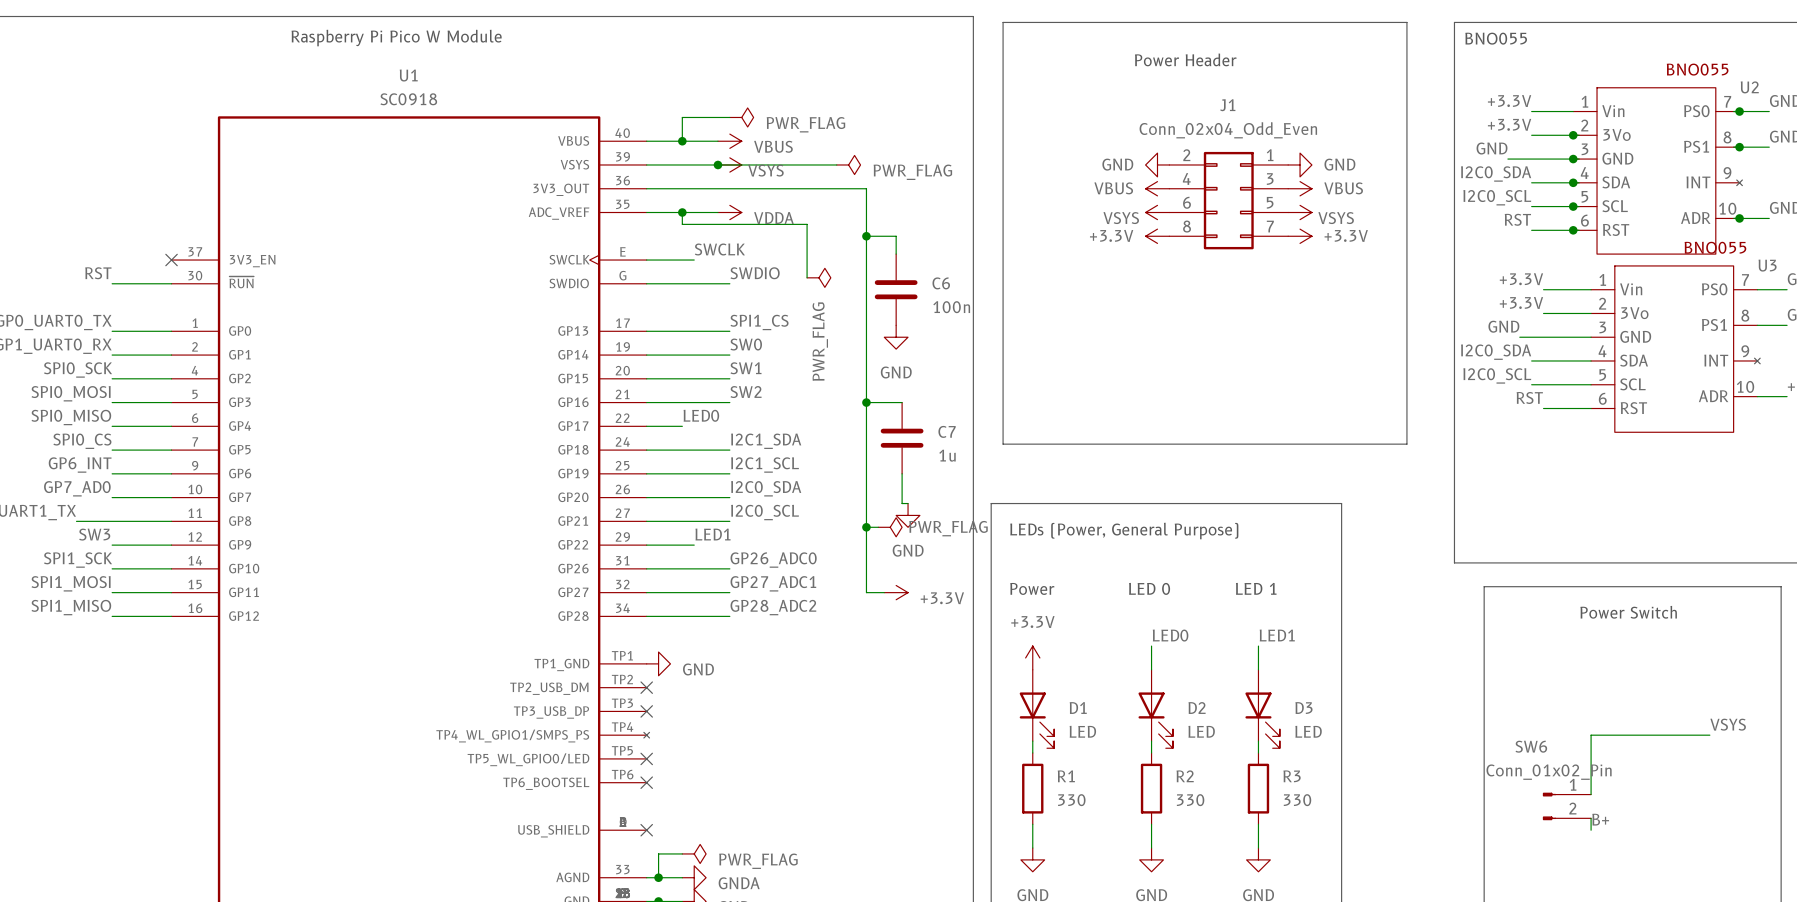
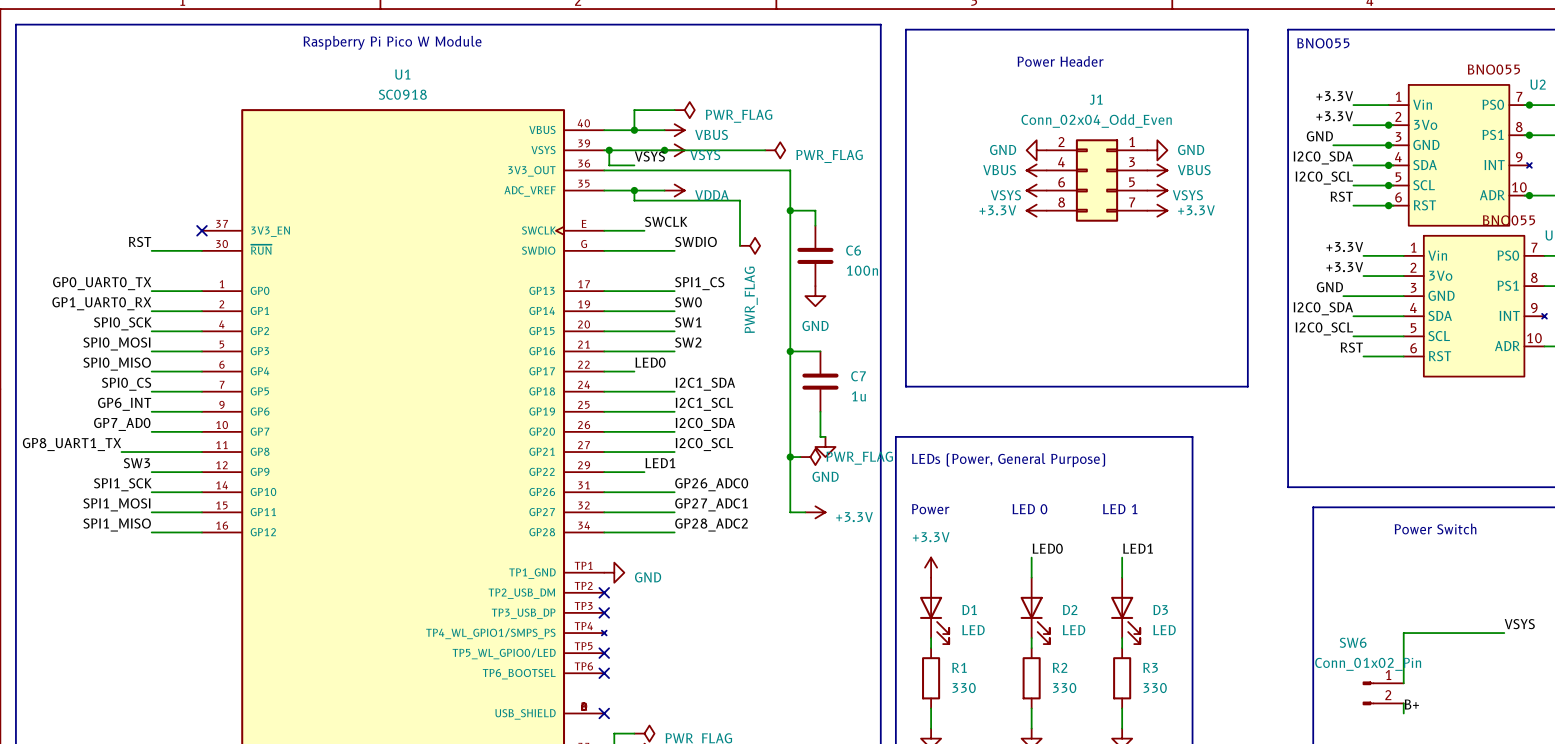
wire: none -> (609, 150) (609, 165) (634, 165)
junction: none -> (609, 150)
label: none -> VSYS (649, 156)

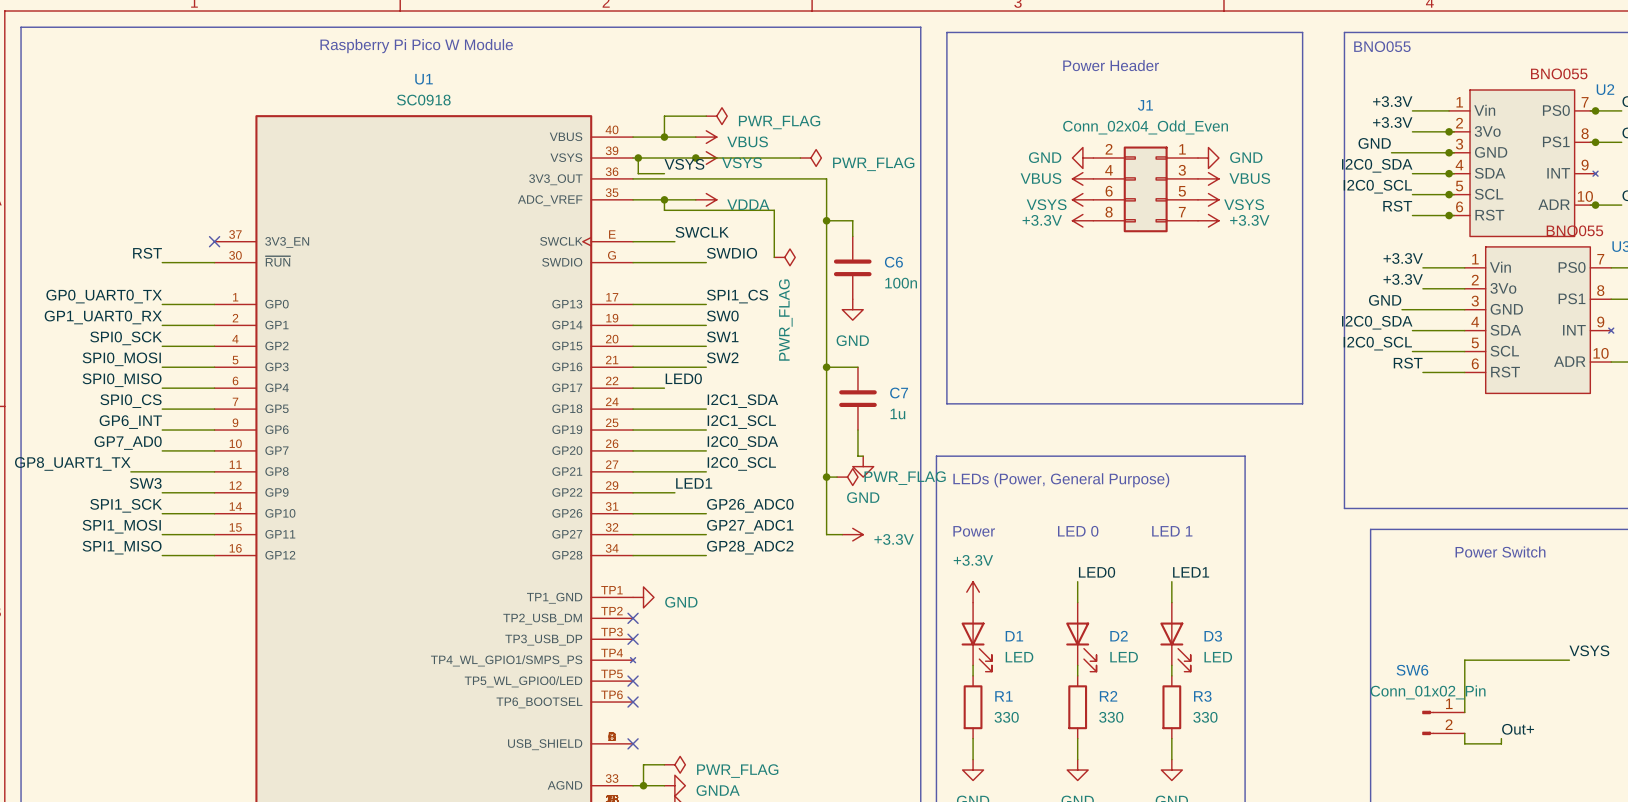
label: none -> Out+ (1518, 729)
label: B+ (1411, 704) -> none
wire: none -> (1501, 738) (1501, 743) (1464, 743)

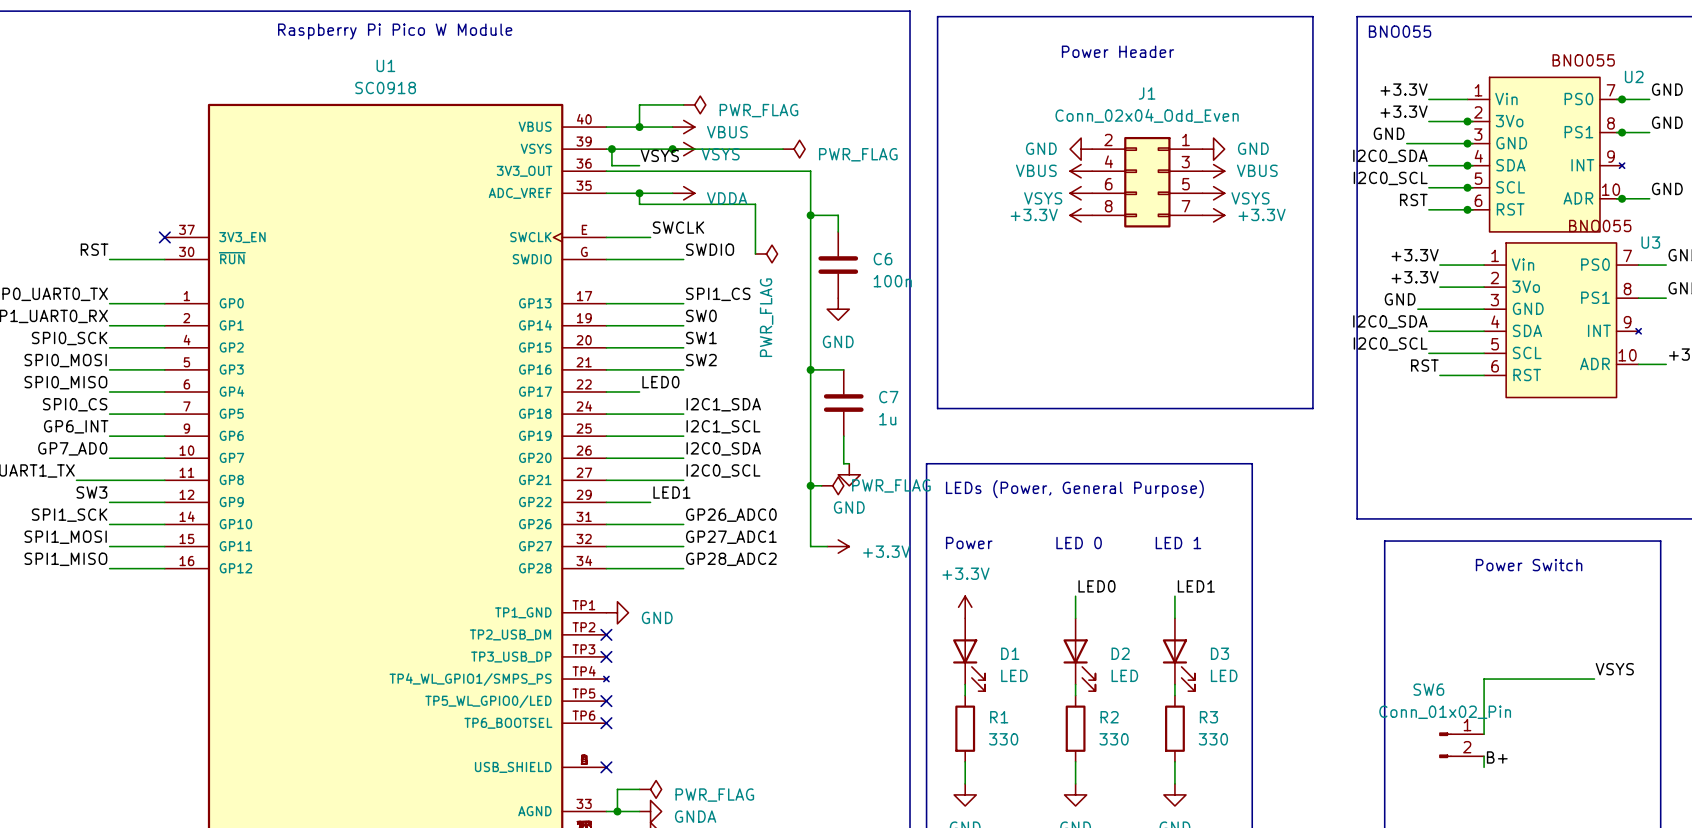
label: Out+ (1518, 729) -> none
label: none -> B+ (1497, 757)
wire: (1501, 738) (1501, 743) (1464, 743) -> none

